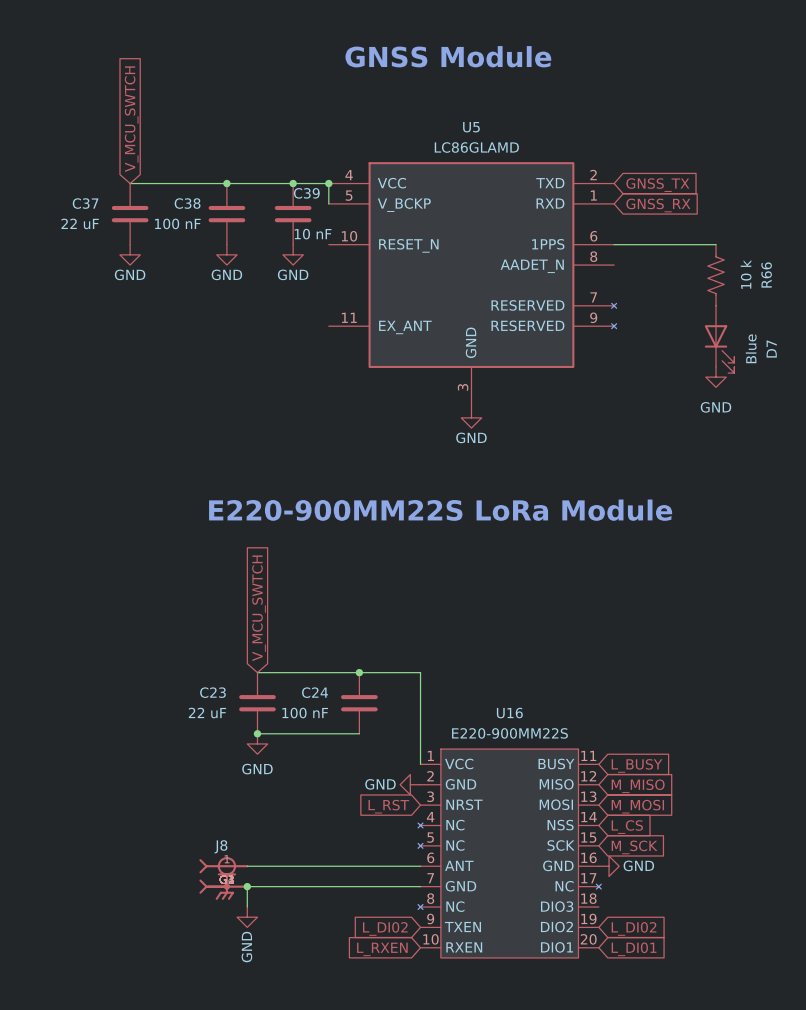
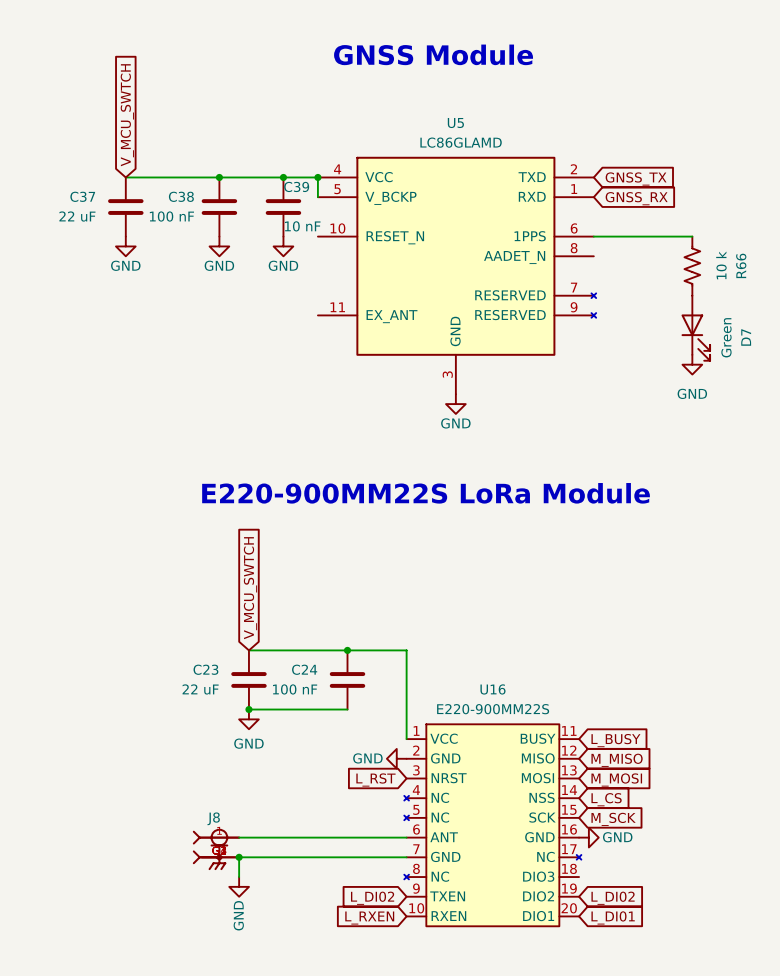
D7 value: Blue (751, 348) -> Green (726, 337)

